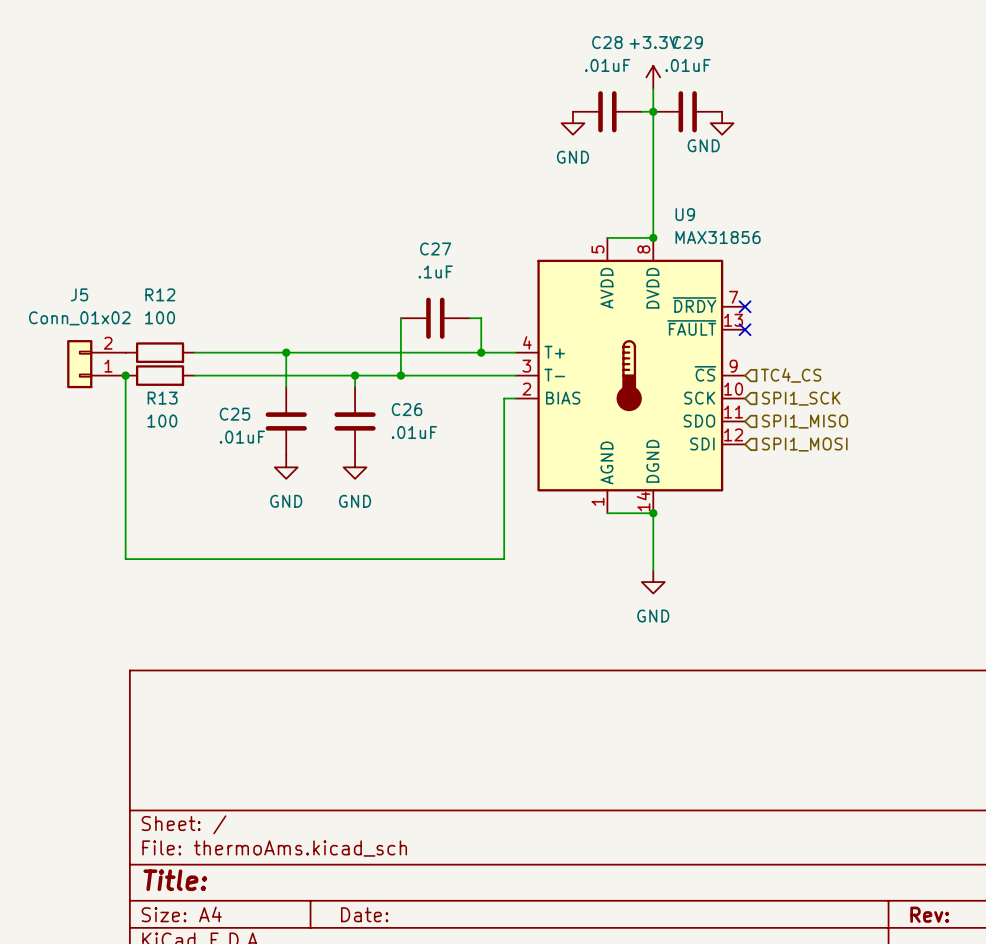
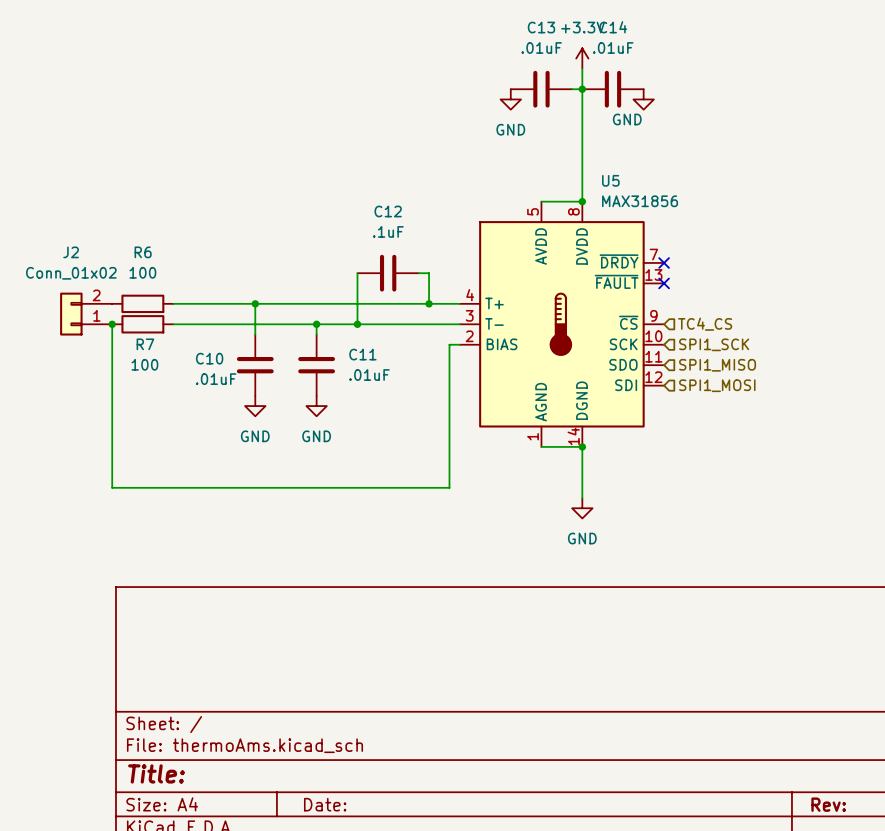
C28 name: C28 (607, 42) -> C13 (541, 27)
C29 name: C29 (687, 42) -> C14 (613, 27)
U9 name: U9 (685, 214) -> U5 (610, 180)
C27 name: C27 (435, 248) -> C12 (388, 211)
J5 name: J5 (79, 294) -> J2 (71, 252)
R12 name: R12 (160, 294) -> R6 (143, 252)
R13 name: R13 (162, 398) -> R7 (145, 344)
C26 name: C26 (407, 409) -> C11 (362, 354)
C25 name: C25 (234, 414) -> C10 (209, 358)

